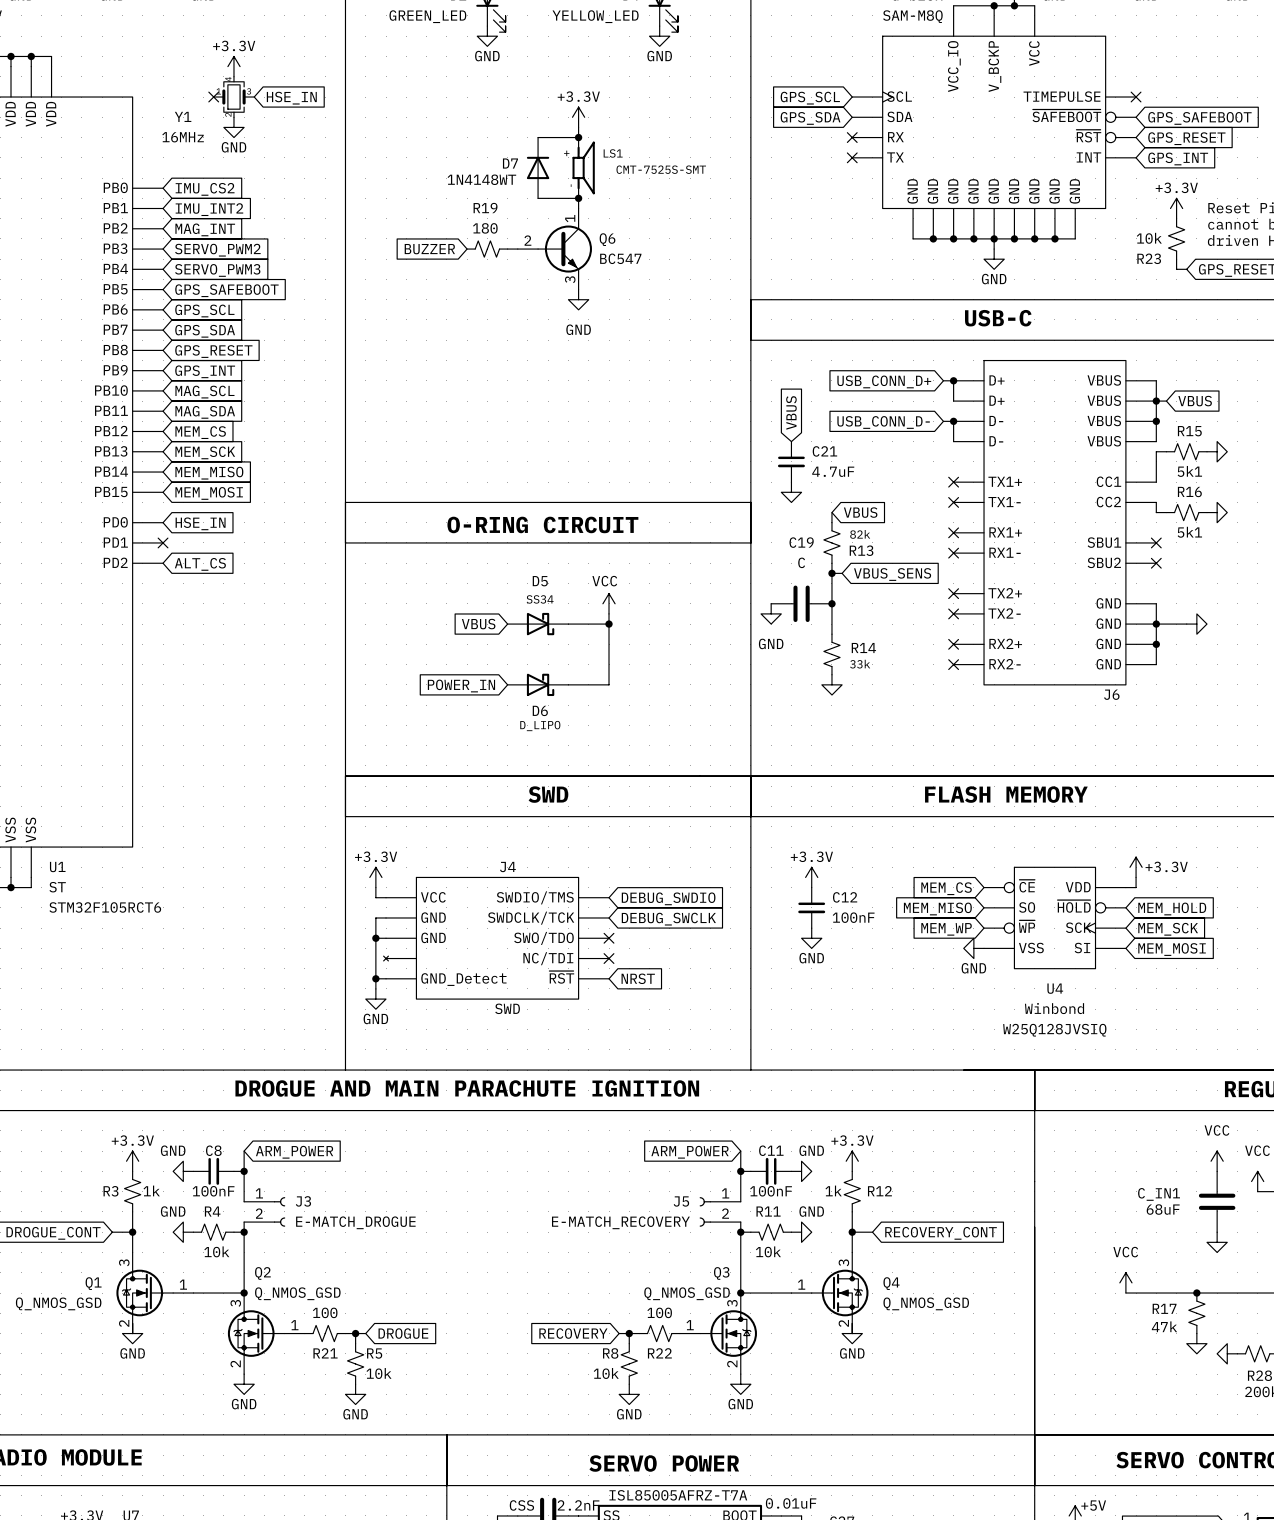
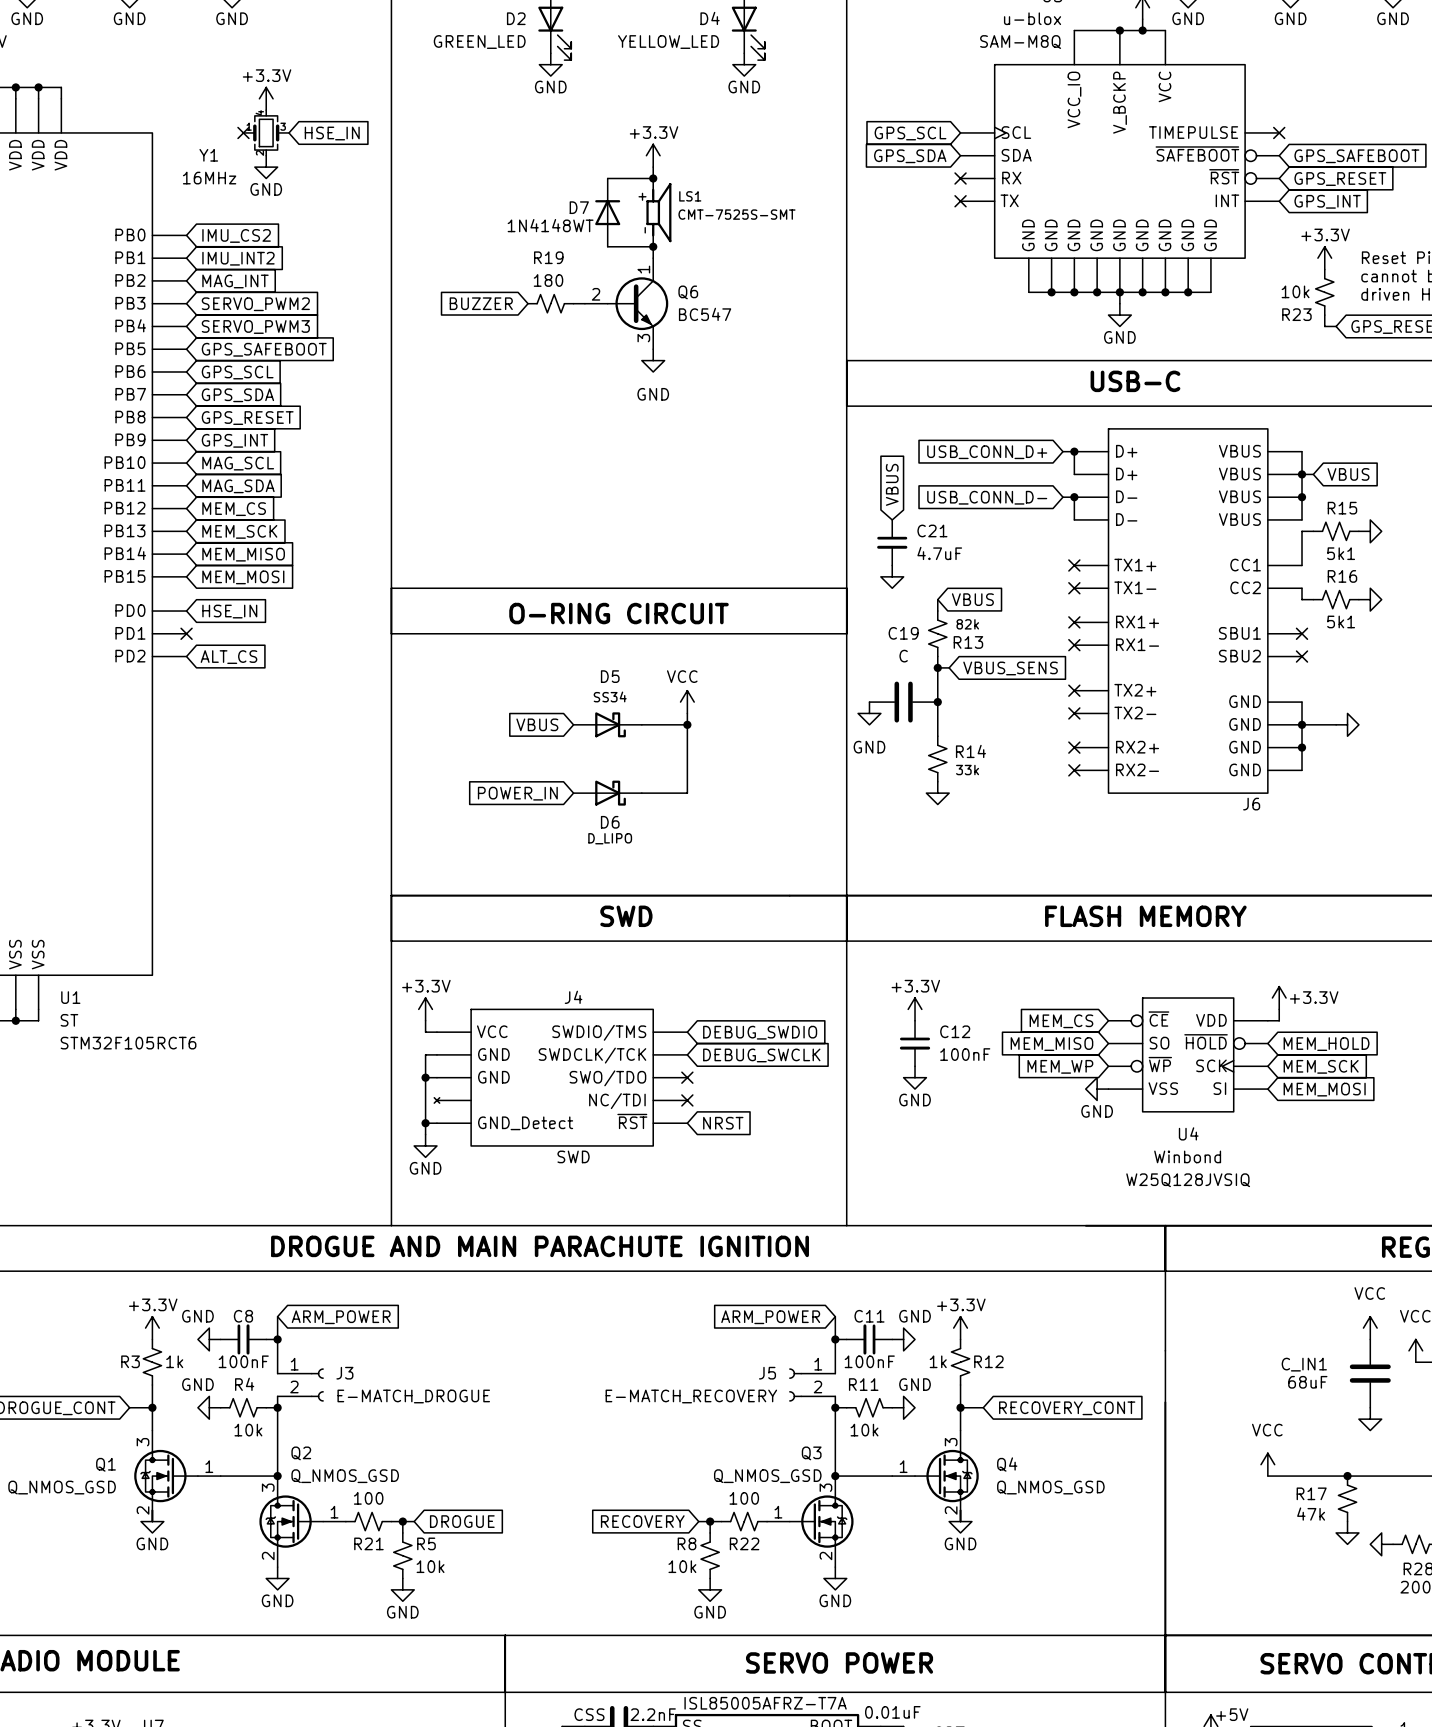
text position: SERVO POWER (664, 1463) -> SERVO POWER (839, 1662)

